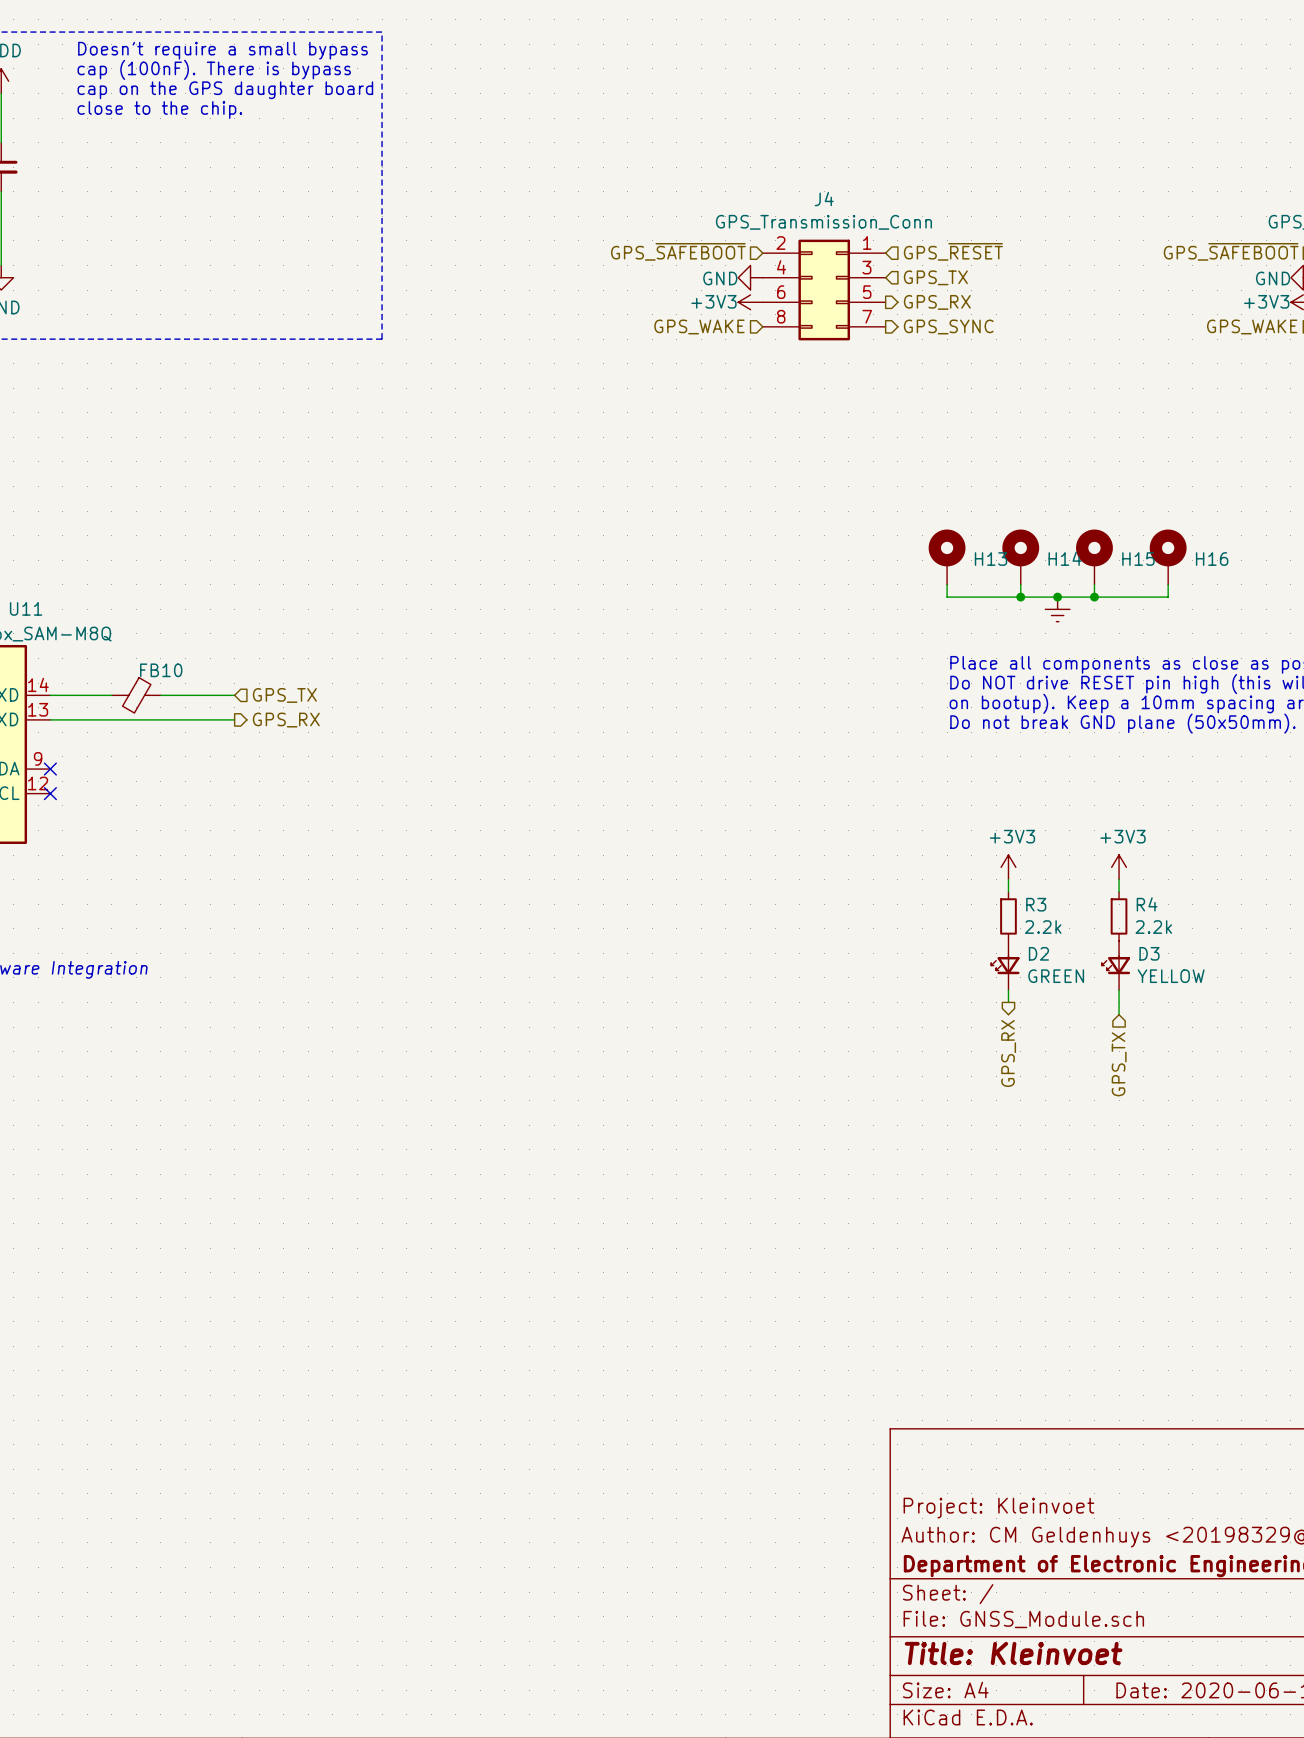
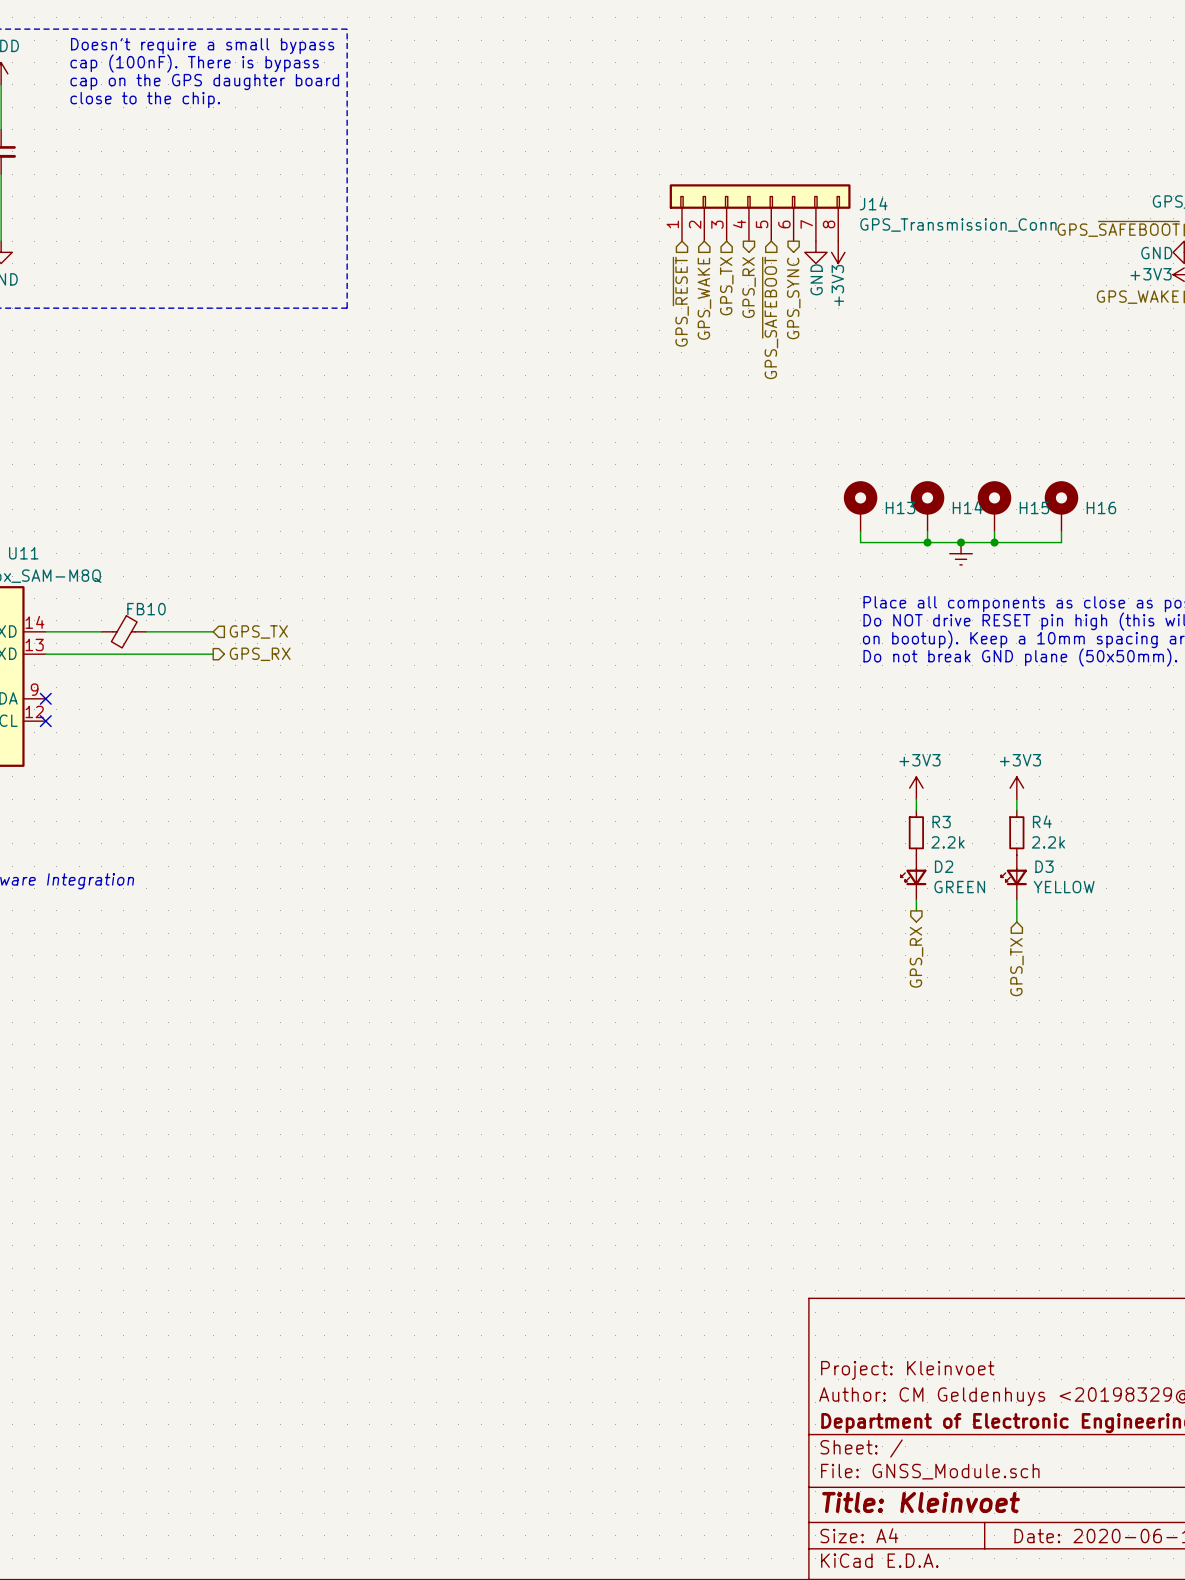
J14: none -> GPS_Transmission_Conn (760, 212)
hierarchical label rotation: 0° (678, 251) -> 90° counterclockwise (770, 317)
hierarchical label position: GPS_~{SAFEBOOT} (678, 251) -> GPS_~{SAFEBOOT} (770, 317)
hierarchical label rotation: 0° (953, 251) -> 90° clockwise (680, 301)
hierarchical label position: GPS_~{RESET} (953, 251) -> GPS_~{RESET} (680, 301)
power symbol rotation: 0° (750, 277) -> 90° counterclockwise (815, 252)
power symbol position: GND (750, 277) -> GND (815, 252)
hierarchical label rotation: 0° (935, 277) -> 90° clockwise (726, 286)
hierarchical label position: GPS_TX (935, 277) -> GPS_TX (726, 286)
J4: GPS_Transmission_Conn (824, 290) -> none
power symbol rotation: 0° (750, 302) -> 90° counterclockwise (838, 252)
power symbol position: +3V3 (750, 302) -> +3V3 (838, 252)
hierarchical label rotation: 0° (937, 302) -> 90° clockwise (749, 287)
hierarchical label position: GPS_RX (937, 302) -> GPS_RX (749, 287)
hierarchical label rotation: 0° (699, 326) -> 90° counterclockwise (704, 298)
hierarchical label rotation: 0° (948, 326) -> 90° clockwise (793, 298)

